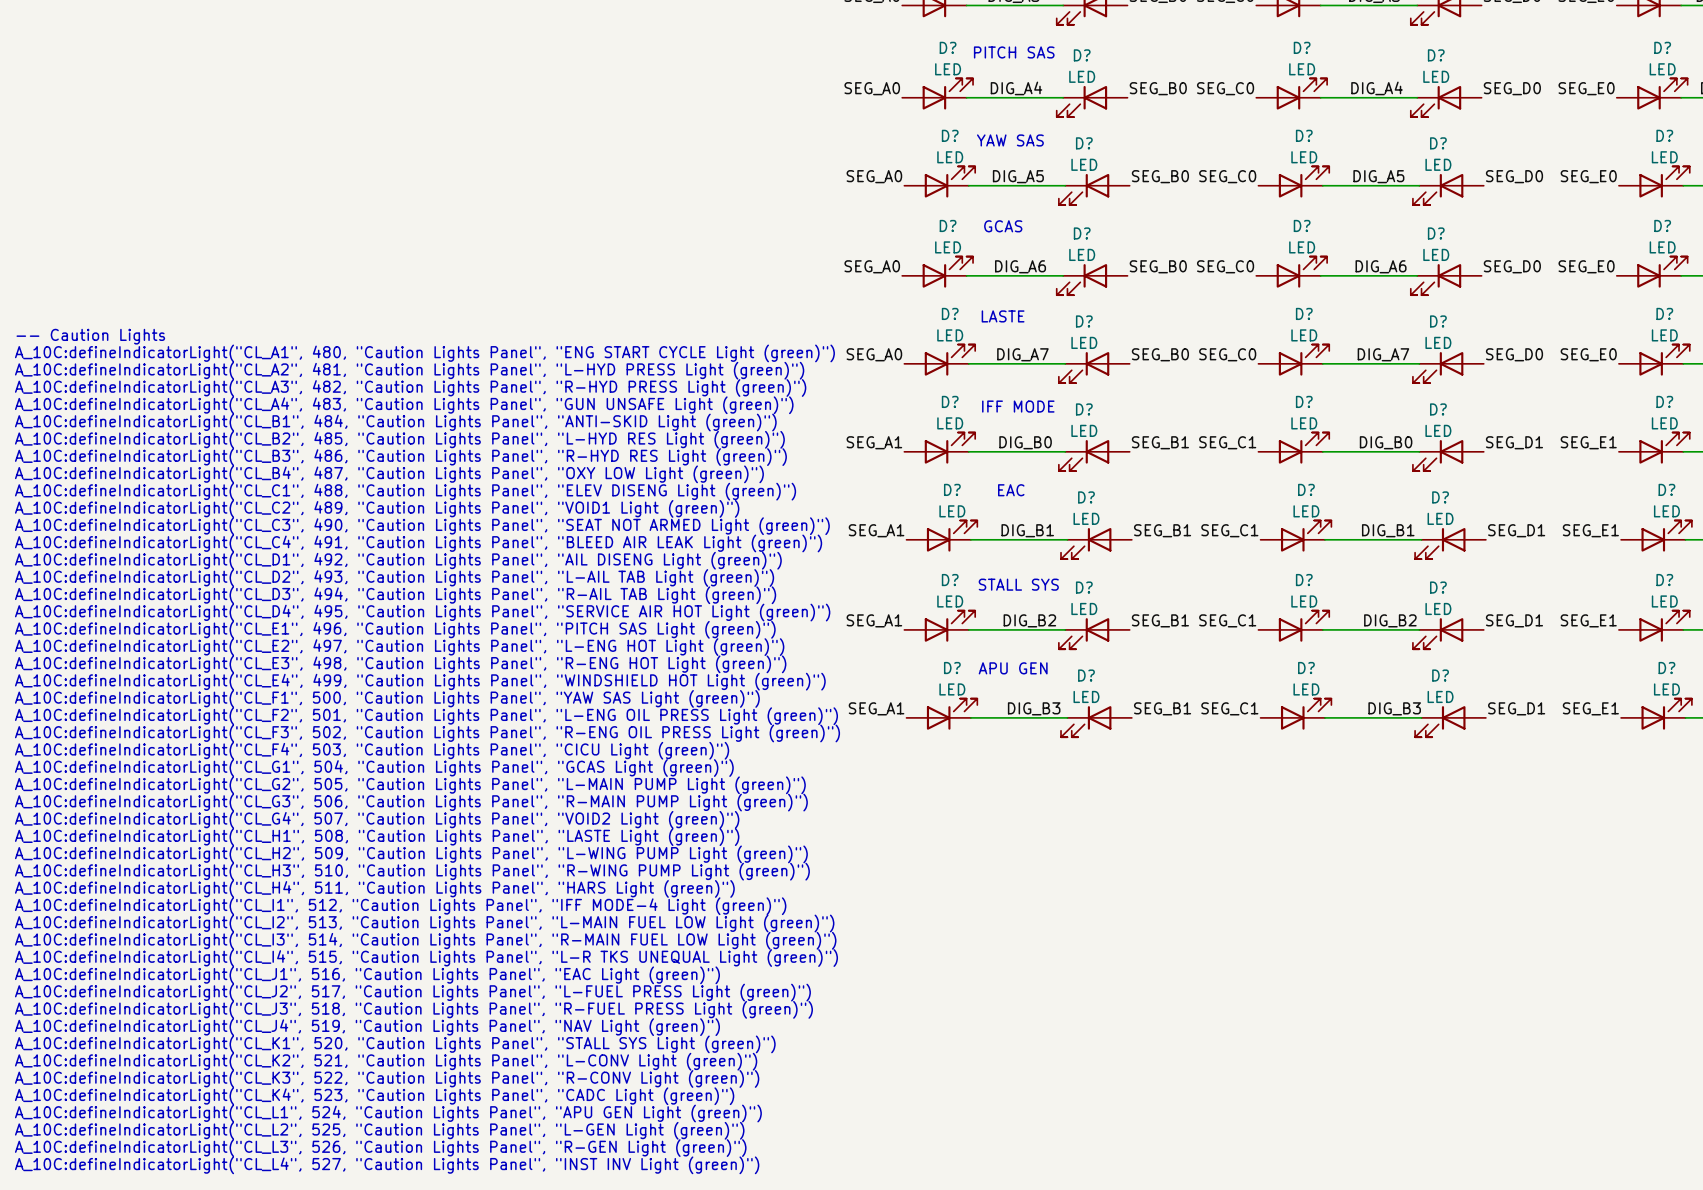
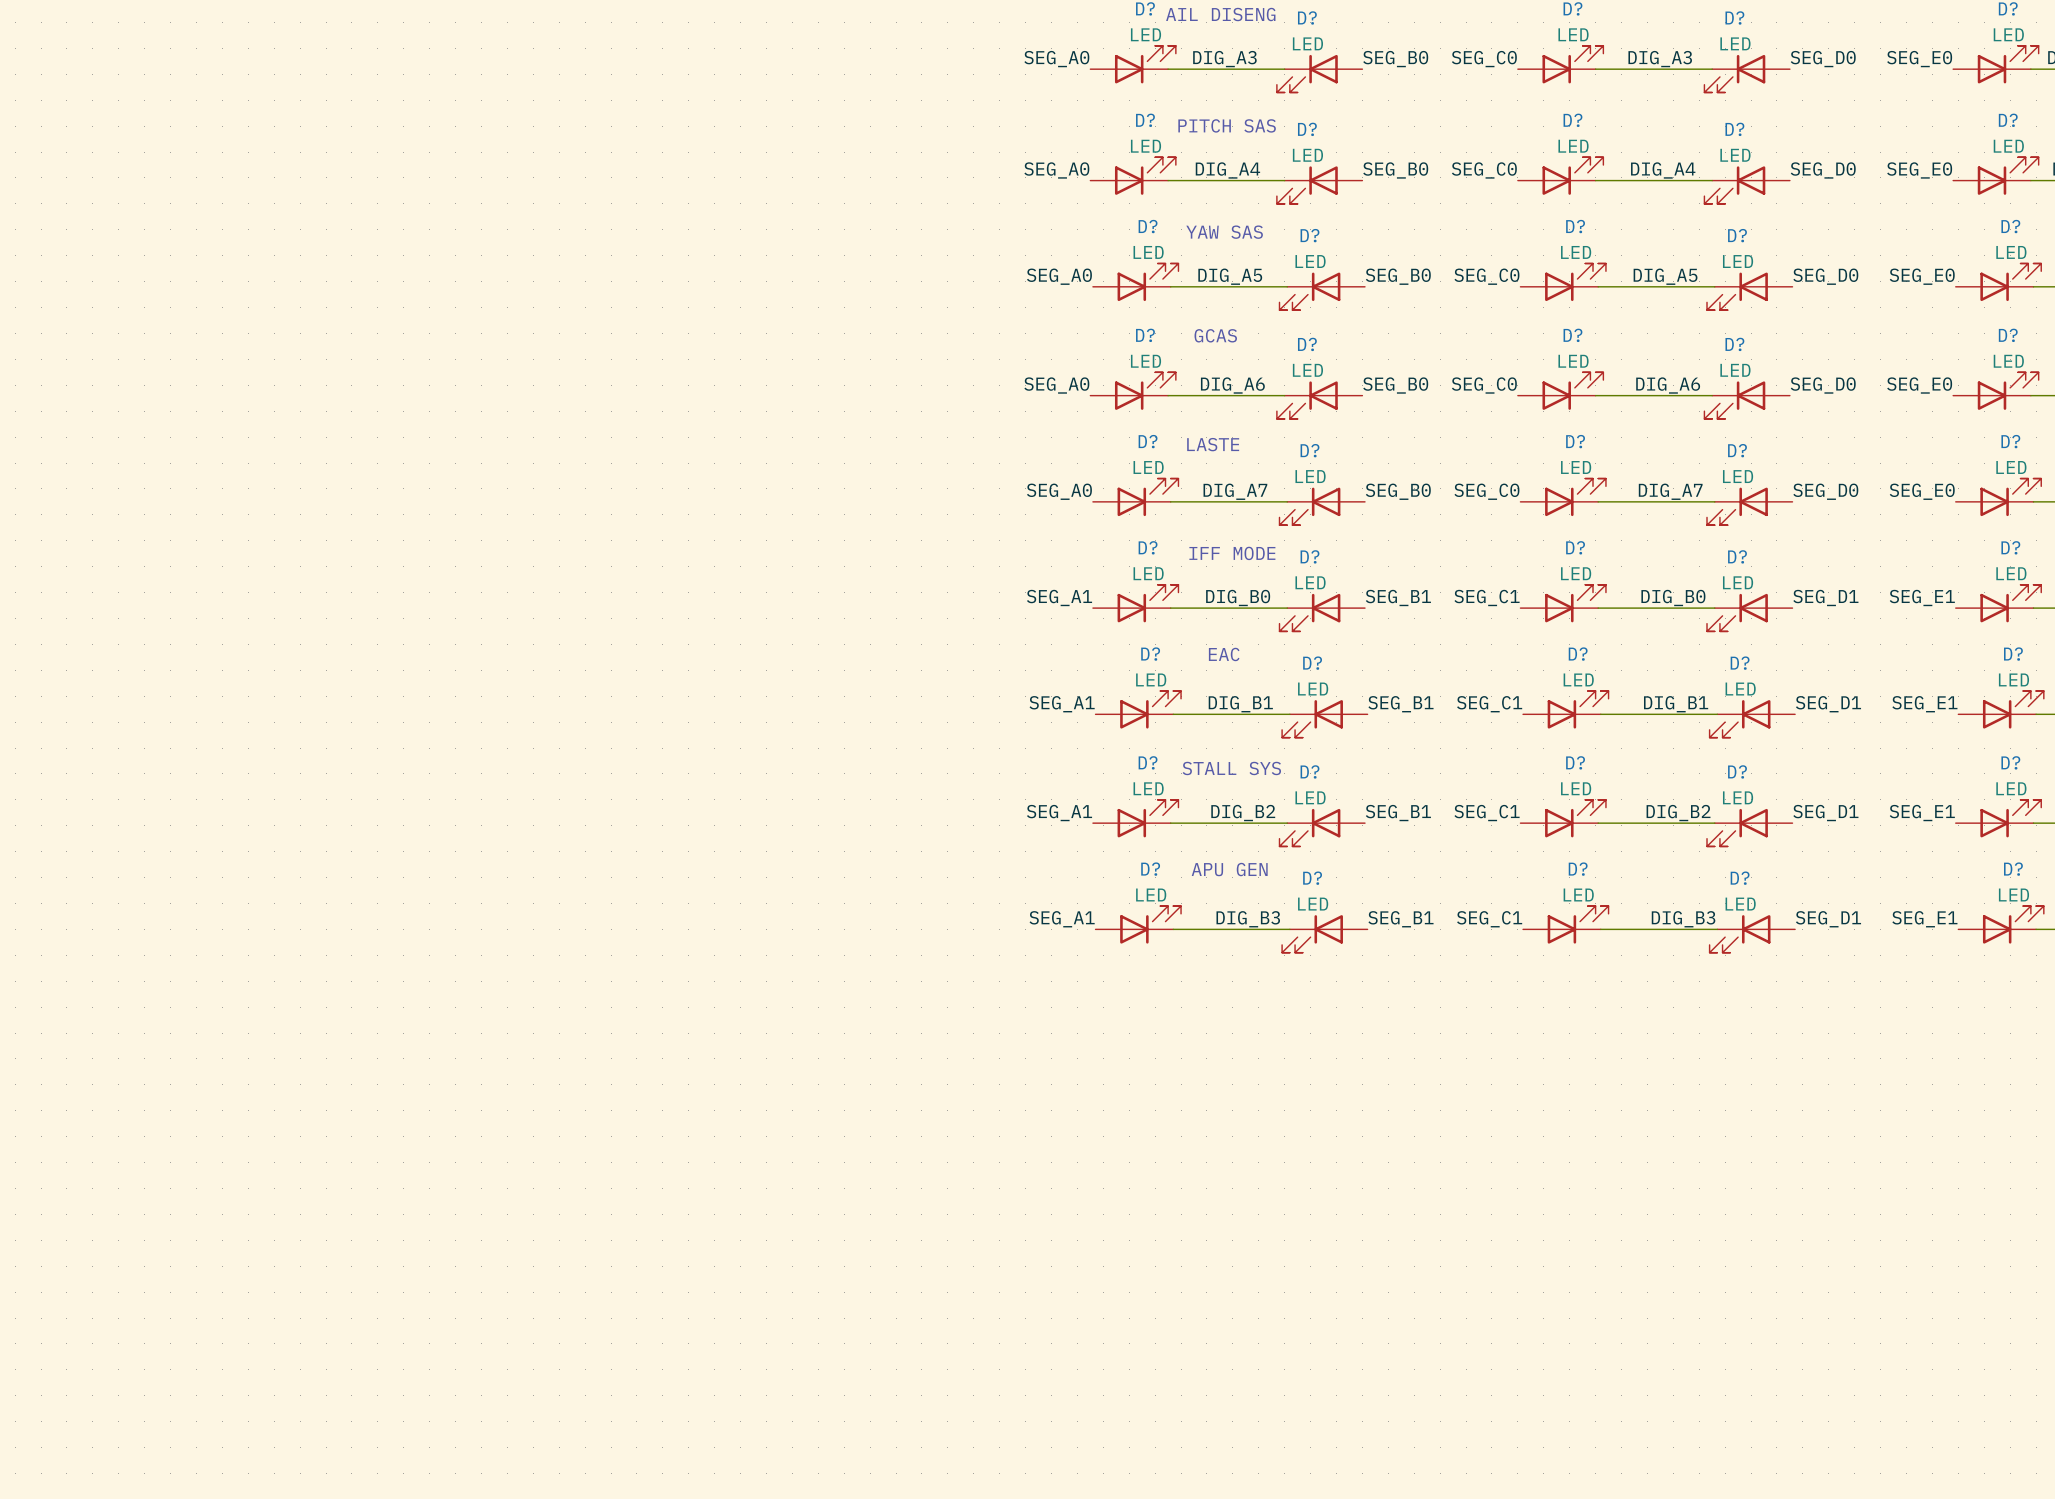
text: -- Caution Lights (90, 336) -> none
text: A_10C:defineIndicatorLight("CL_A1", 480, "Caution Lights Panel", "ENG START CYCLE Light (green)") (424, 353) -> none
text: A_10C:defineIndicatorLight("CL_A2", 481, "Caution Lights Panel", "L-HYD PRESS Light (green)") (409, 370) -> none
text: A_10C:defineIndicatorLight("CL_A3", 482, "Caution Lights Panel", "R-HYD PRESS Light (green)") (410, 387) -> none
text: A_10C:defineIndicatorLight("CL_A4", 483, "Caution Lights Panel", "GUN UNSAFE Light (green)") (404, 405) -> none
text: A_10C:defineIndicatorLight("CL_B1", 484, "Caution Lights Panel", "ANTI-SKID Light (green)") (395, 422) -> none
text: A_10C:defineIndicatorLight("CL_B2", 485, "Caution Lights Panel", "L-HYD RES Light (green)") (399, 439) -> none
text: A_10C:defineIndicatorLight("CL_B3", 486, "Caution Lights Panel", "R-HYD RES Light (green)") (400, 457) -> none
text: A_10C:defineIndicatorLight("CL_B4", 487, "Caution Lights Panel", "OXY LOW Light (green)") (389, 474) -> none
text: A_10C:defineIndicatorLight("CL_C1", 488, "Caution Lights Panel", "ELEV DISENG Light (green)") (405, 491) -> none
text: A_10C:defineIndicatorLight("CL_C2", 489, "Caution Lights Panel", "VOID1 Light (green)") (377, 508) -> none
text: A_10C:defineIndicatorLight("CL_C3", 490, "Caution Lights Panel", "SEAT NOT ARMED Light (green)") (422, 526) -> none
text: A_10C:defineIndicatorLight("CL_C4", 491, "Caution Lights Panel", "BLEED AIR LEAK Light (green)") (418, 543) -> none
text: A_10C:defineIndicatorLight("CL_D1", 492, "Caution Lights Panel", "AIL DISENG Light (green)") (398, 560) -> none
text: A_10C:defineIndicatorLight("CL_D2", 493, "Caution Lights Panel", "L-AIL TAB Light (green)") (394, 578) -> none
text: A_10C:defineIndicatorLight("CL_D3", 494, "Caution Lights Panel", "R-AIL TAB Light (green)") (395, 595) -> none
text: A_10C:defineIndicatorLight("CL_D4", 495, "Caution Lights Panel", "SERVICE AIR HOT Light (green)") (422, 612) -> none
text: A_10C:defineIndicatorLight("CL_E1", 496, "Caution Lights Panel", "PITCH SAS Light (green)") (395, 629) -> none
text: A_10C:defineIndicatorLight("CL_E2", 497, "Caution Lights Panel", "L-ENG HOT Light (green)") (399, 647) -> none
text: A_10C:defineIndicatorLight("CL_E3", 498, "Caution Lights Panel", "R-ENG HOT Light (green)") (400, 664) -> none
text: A_10C:defineIndicatorLight("CL_E4", 499, "Caution Lights Panel", "WINDSHIELD HOT Light (green)") (420, 681) -> none
text: A_10C:defineIndicatorLight("CL_F1", 500, "Caution Lights Panel", "YAW SAS Light (green)") (387, 698) -> none
text: A_10C:defineIndicatorLight("CL_F2", 501, "Caution Lights Panel", "L-ENG OIL PRESS Light (green)") (426, 716) -> none
text: A_10C:defineIndicatorLight("CL_F3", 502, "Caution Lights Panel", "R-ENG OIL PRESS Light (green)") (427, 733) -> none
text: A_10C:defineIndicatorLight("CL_F4", 503, "Caution Lights Panel", "CICU Light (green)") (372, 750) -> none
text: A_10C:defineIndicatorLight("CL_G1", 504, "Caution Lights Panel", "GCAS Light (green)") (374, 768) -> none
text: A_10C:defineIndicatorLight("CL_G2", 505, "Caution Lights Panel", "L-MAIN PUMP Light (green)") (410, 785) -> none
text: A_10C:defineIndicatorLight("CL_G3", 506, "Caution Lights Panel", "R-MAIN PUMP Light (green)") (411, 802) -> none
text: A_10C:defineIndicatorLight("CL_G4", 507, "Caution Lights Panel", "VOID2 Light (green)") (377, 819) -> none
text: A_10C:defineIndicatorLight("CL_H1", 508, "Caution Lights Panel", "LASTE Light (green)") (377, 837) -> none
text: A_10C:defineIndicatorLight("CL_H2", 509, "Caution Lights Panel", "L-WING PUMP Light (green)") (411, 854) -> none
text: A_10C:defineIndicatorLight("CL_H3", 510, "Caution Lights Panel", "R-WING PUMP Light (green)") (412, 871) -> none
text: A_10C:defineIndicatorLight("CL_H4", 511, "Caution Lights Panel", "HARS Light (green)") (374, 888) -> none
text: A_10C:defineIndicatorLight("CL_I1", 512, "Caution Lights Panel", "IFF MODE-4 Light (green)") (400, 906) -> none
text: A_10C:defineIndicatorLight("CL_I2", 513, "Caution Lights Panel", "L-MAIN FUEL LOW Light (green)") (424, 923) -> none
text: A_10C:defineIndicatorLight("CL_I3", 514, "Caution Lights Panel", "R-MAIN FUEL LOW Light (green)") (425, 940) -> none
text: A_10C:defineIndicatorLight("CL_I4", 515, "Caution Lights Panel", "L-R TKS UNEQUAL Light (green)") (426, 958) -> none
text: A_10C:defineIndicatorLight("CL_J1", 516, "Caution Lights Panel", "EAC Light (green)") (367, 975) -> none
text: A_10C:defineIndicatorLight("CL_J2", 517, "Caution Lights Panel", "L-FUEL PRESS Light (green)") (412, 992) -> none
text: A_10C:defineIndicatorLight("CL_J3", 518, "Caution Lights Panel", "R-FUEL PRESS Light (green)") (413, 1009) -> none
text: A_10C:defineIndicatorLight("CL_J4", 519, "Caution Lights Panel", "NAV Light (green)") (367, 1027) -> none
text: A_10C:defineIndicatorLight("CL_K1", 520, "Caution Lights Panel", "STALL SYS Light (green)") (395, 1044) -> none
text: A_10C:defineIndicatorLight("CL_K2", 521, "Caution Lights Panel", "L-CONV Light (green)") (386, 1061) -> none
text: A_10C:defineIndicatorLight("CL_K3", 522, "Caution Lights Panel", "R-CONV Light (green)") (387, 1078) -> none
text: A_10C:defineIndicatorLight("CL_K4", 523, "Caution Lights Panel", "CADC Light (green)") (374, 1096) -> none
text: A_10C:defineIndicatorLight("CL_L1", 524, "Caution Lights Panel", "APU GEN Light (green)") (388, 1113) -> none
text: A_10C:defineIndicatorLight("CL_L2", 525, "Caution Lights Panel", "L-GEN Light (green)") (379, 1130) -> none
text: A_10C:defineIndicatorLight("CL_L3", 526, "Caution Lights Panel", "R-GEN Light (green)") (380, 1148) -> none
text: A_10C:defineIndicatorLight("CL_L4", 527, "Caution Lights Panel", "INST INV Light (green)") (387, 1165) -> none

